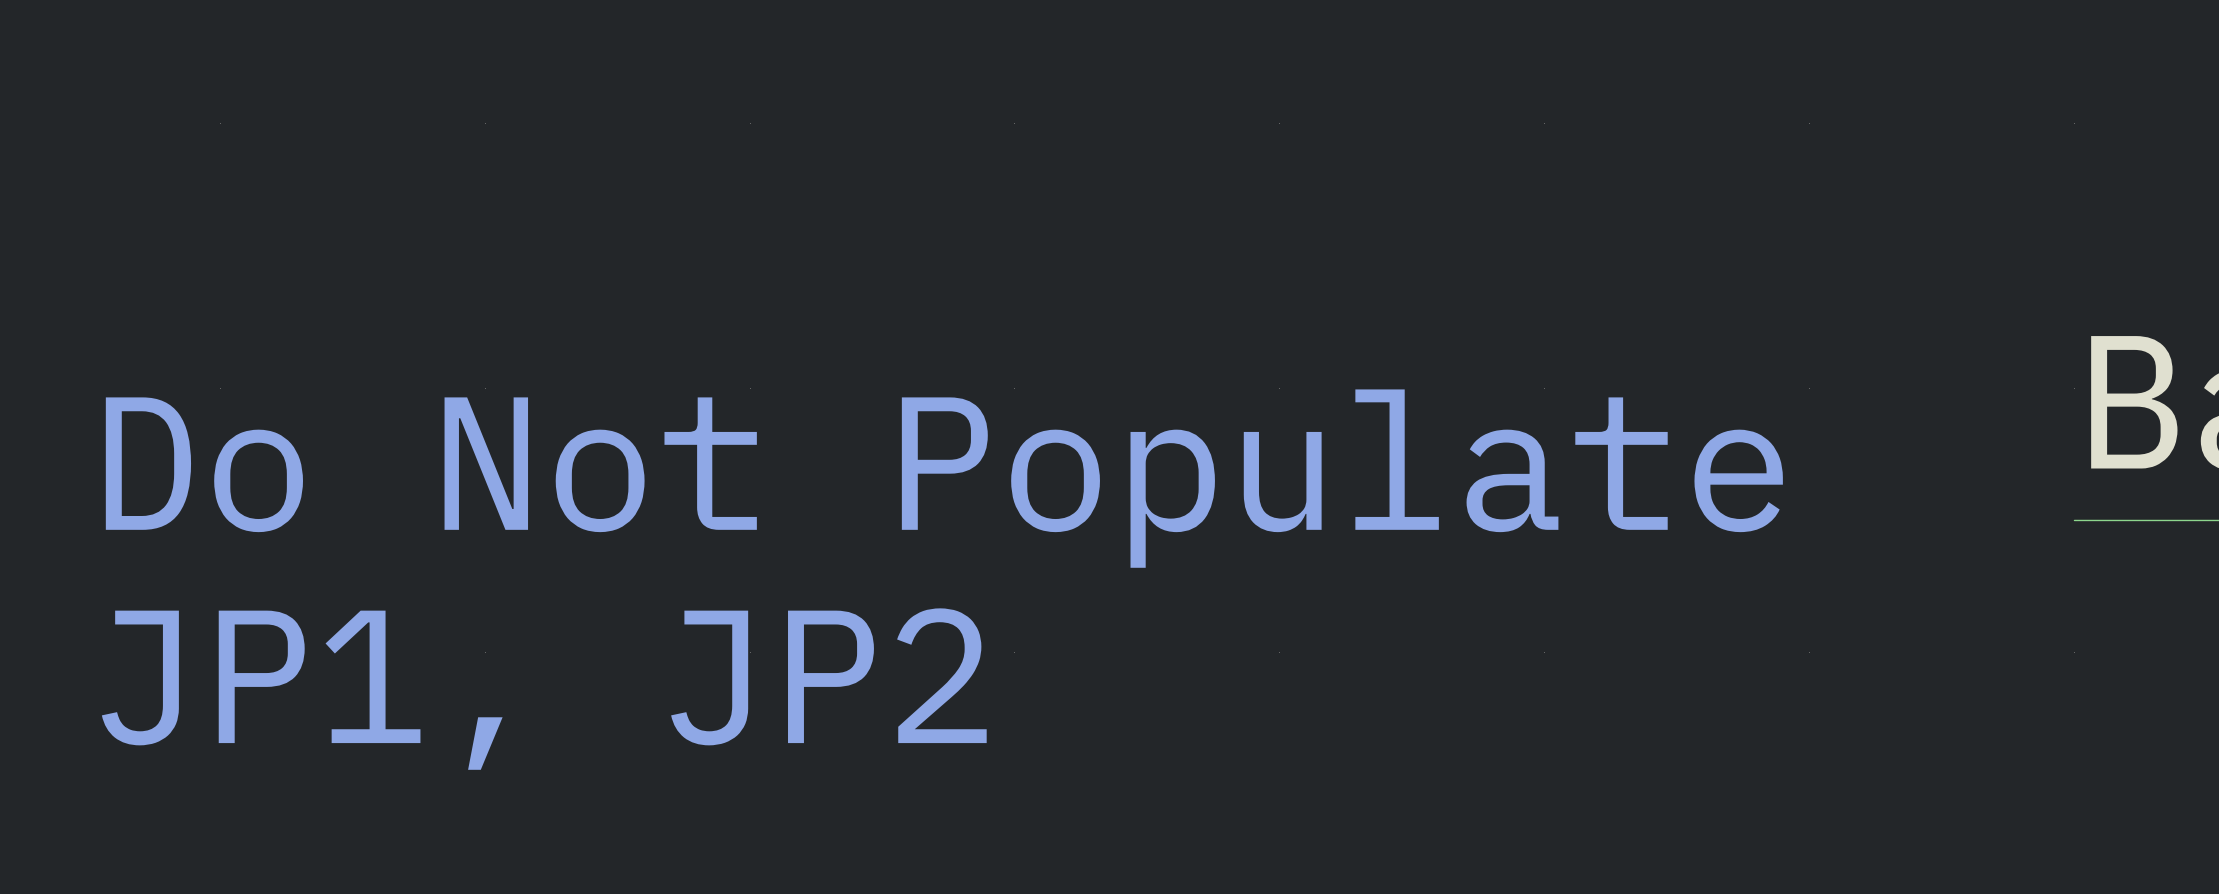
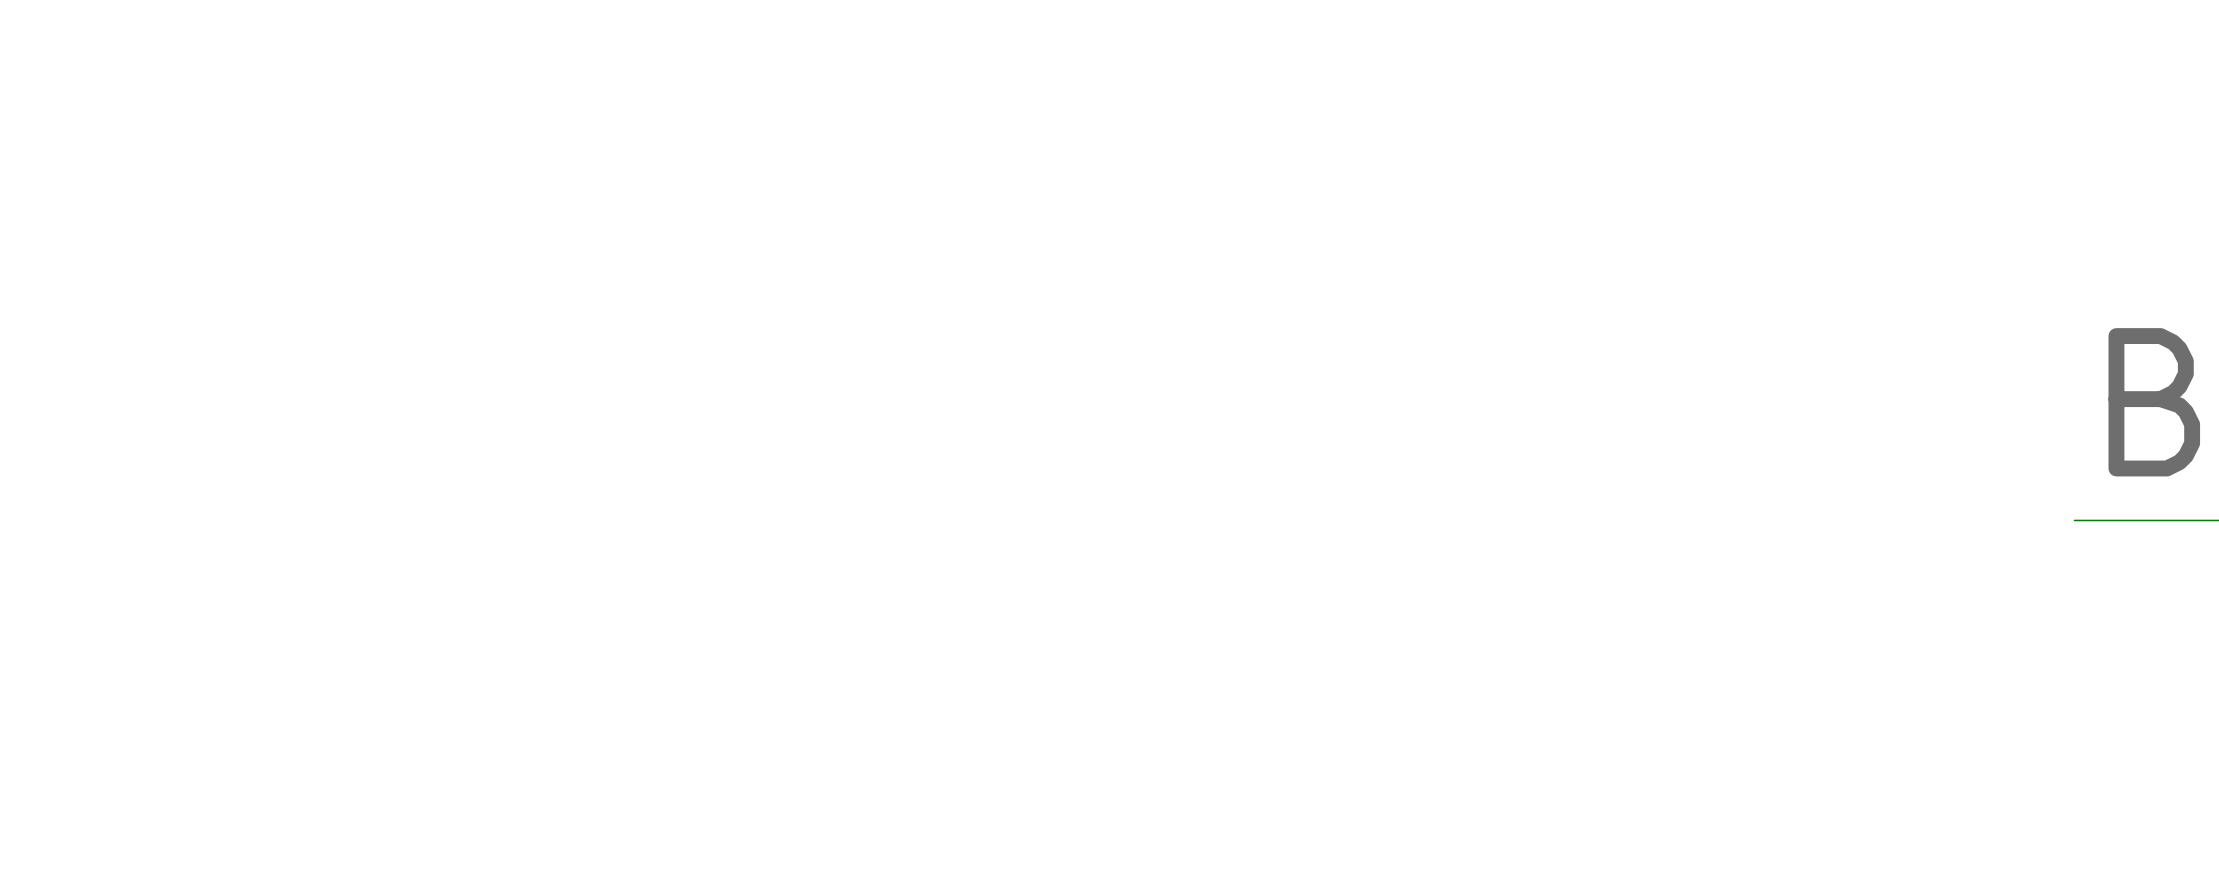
text: Do Not Populate (944, 478) -> none
text: JP1, JP2 (544, 689) -> none

